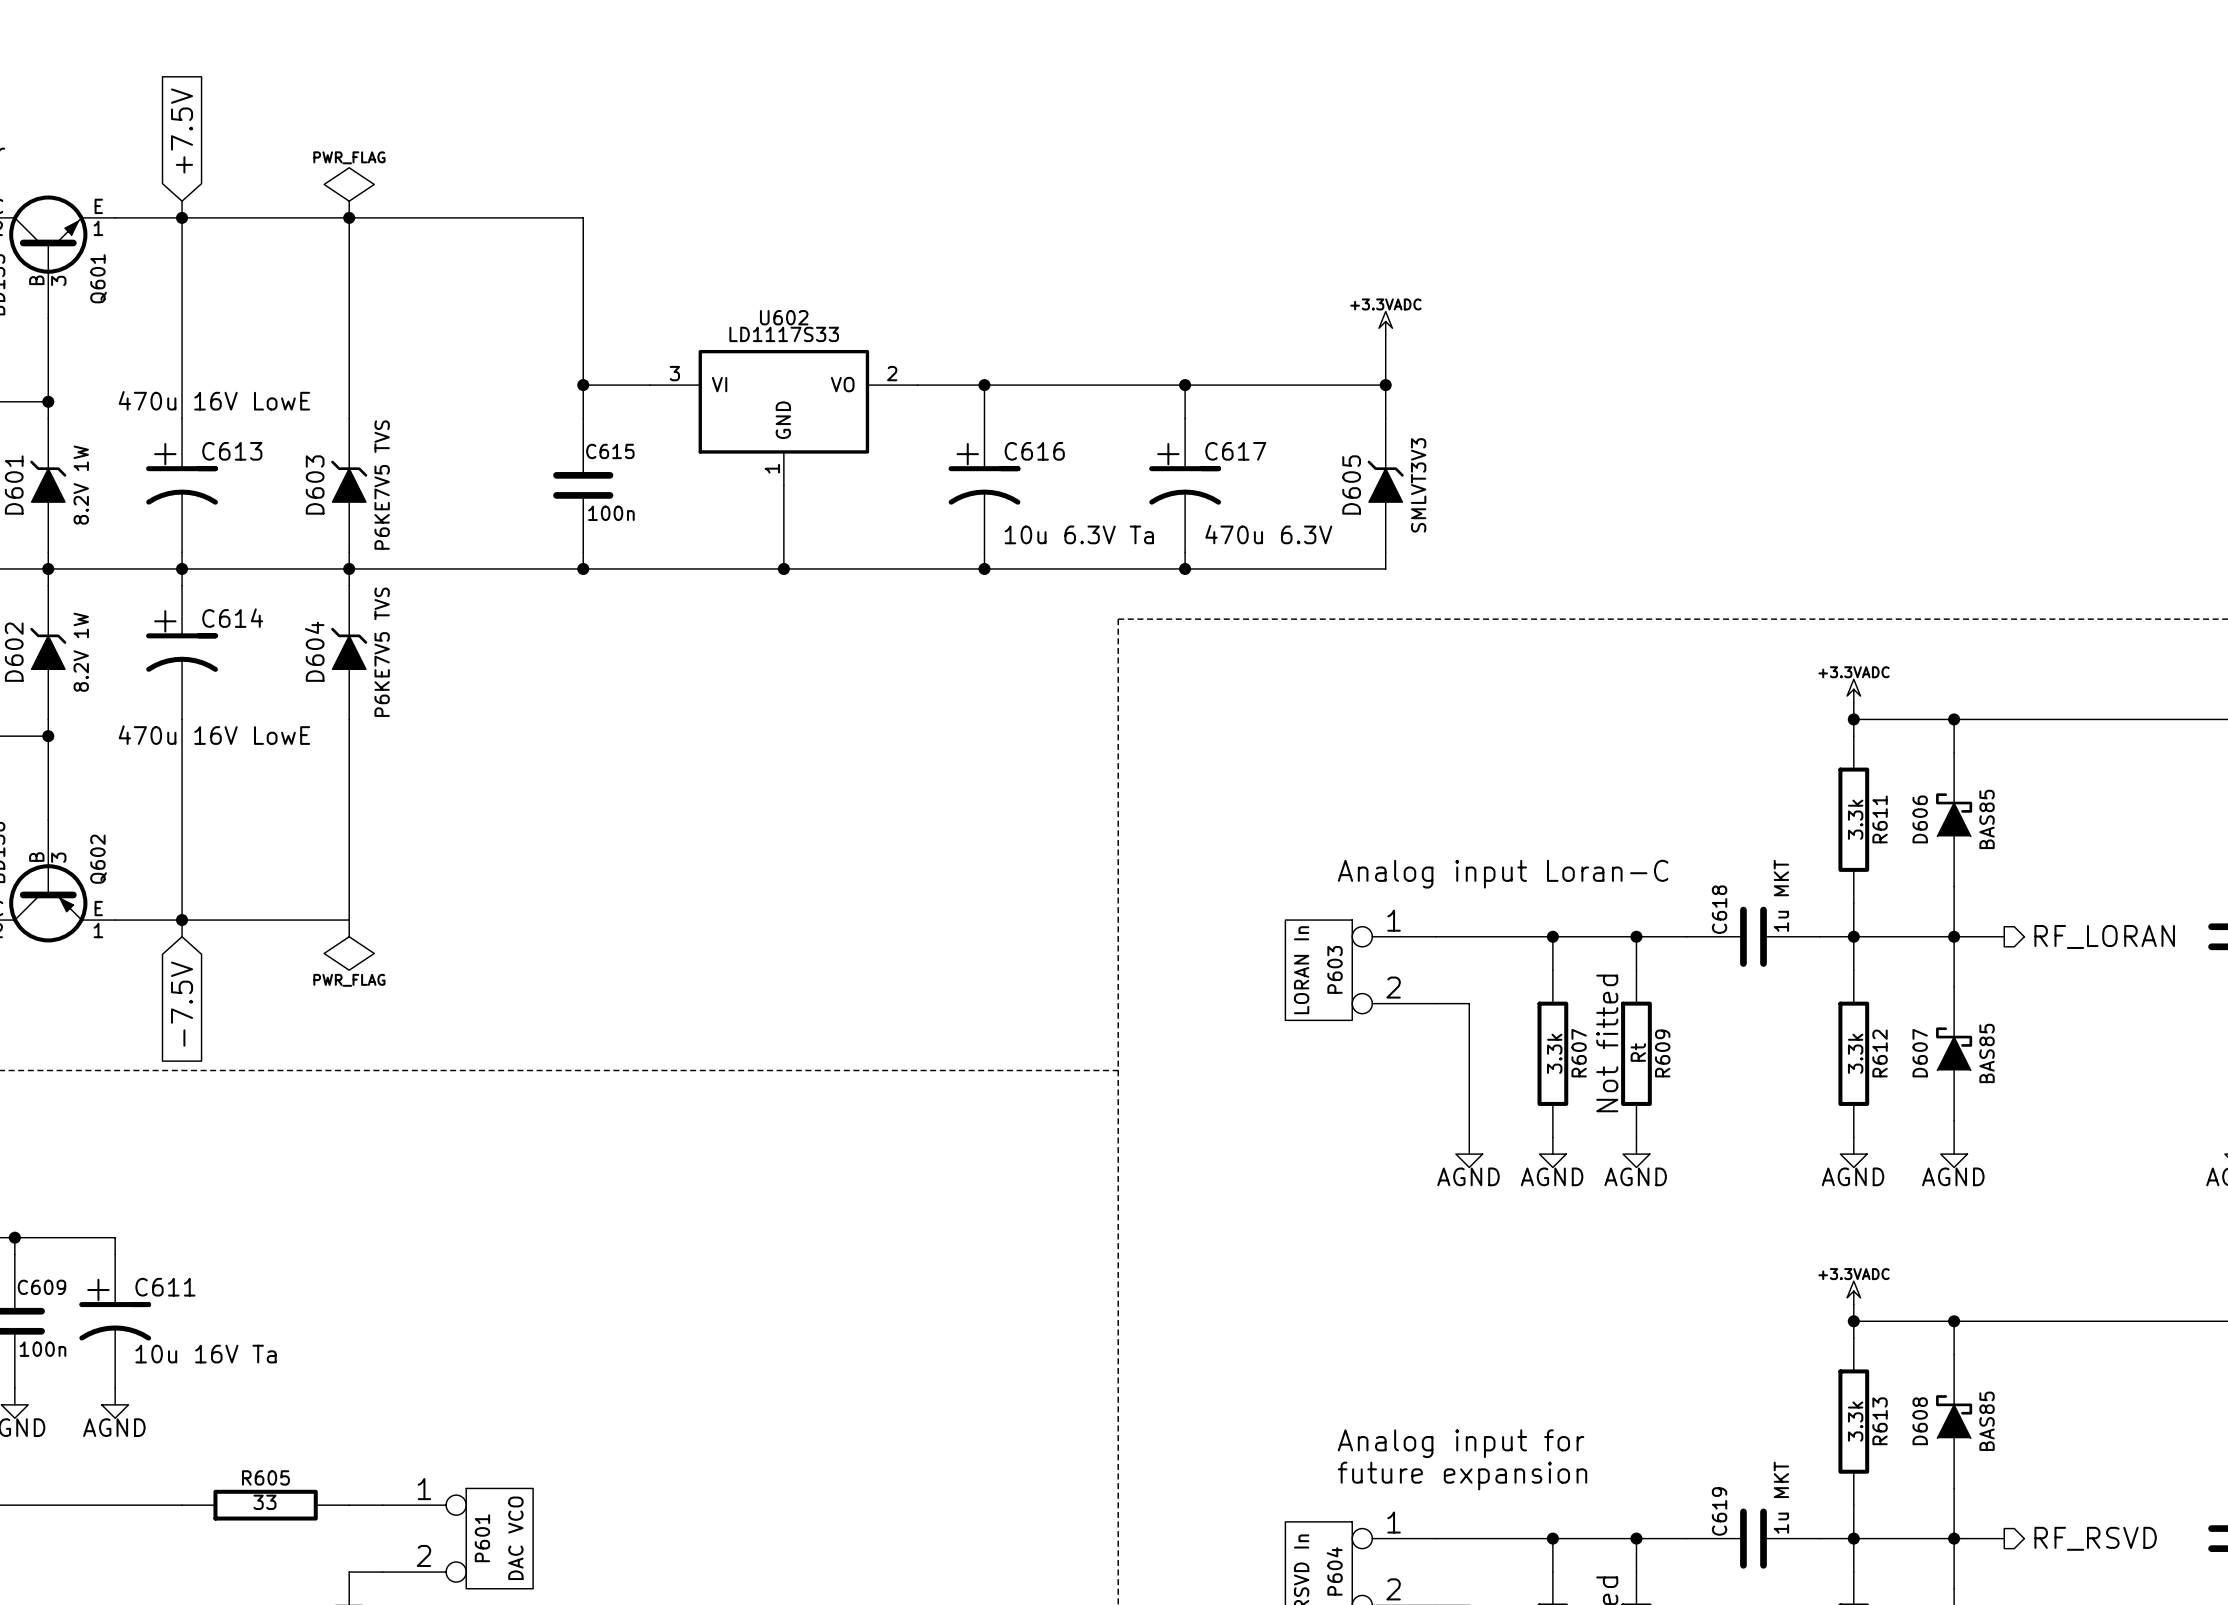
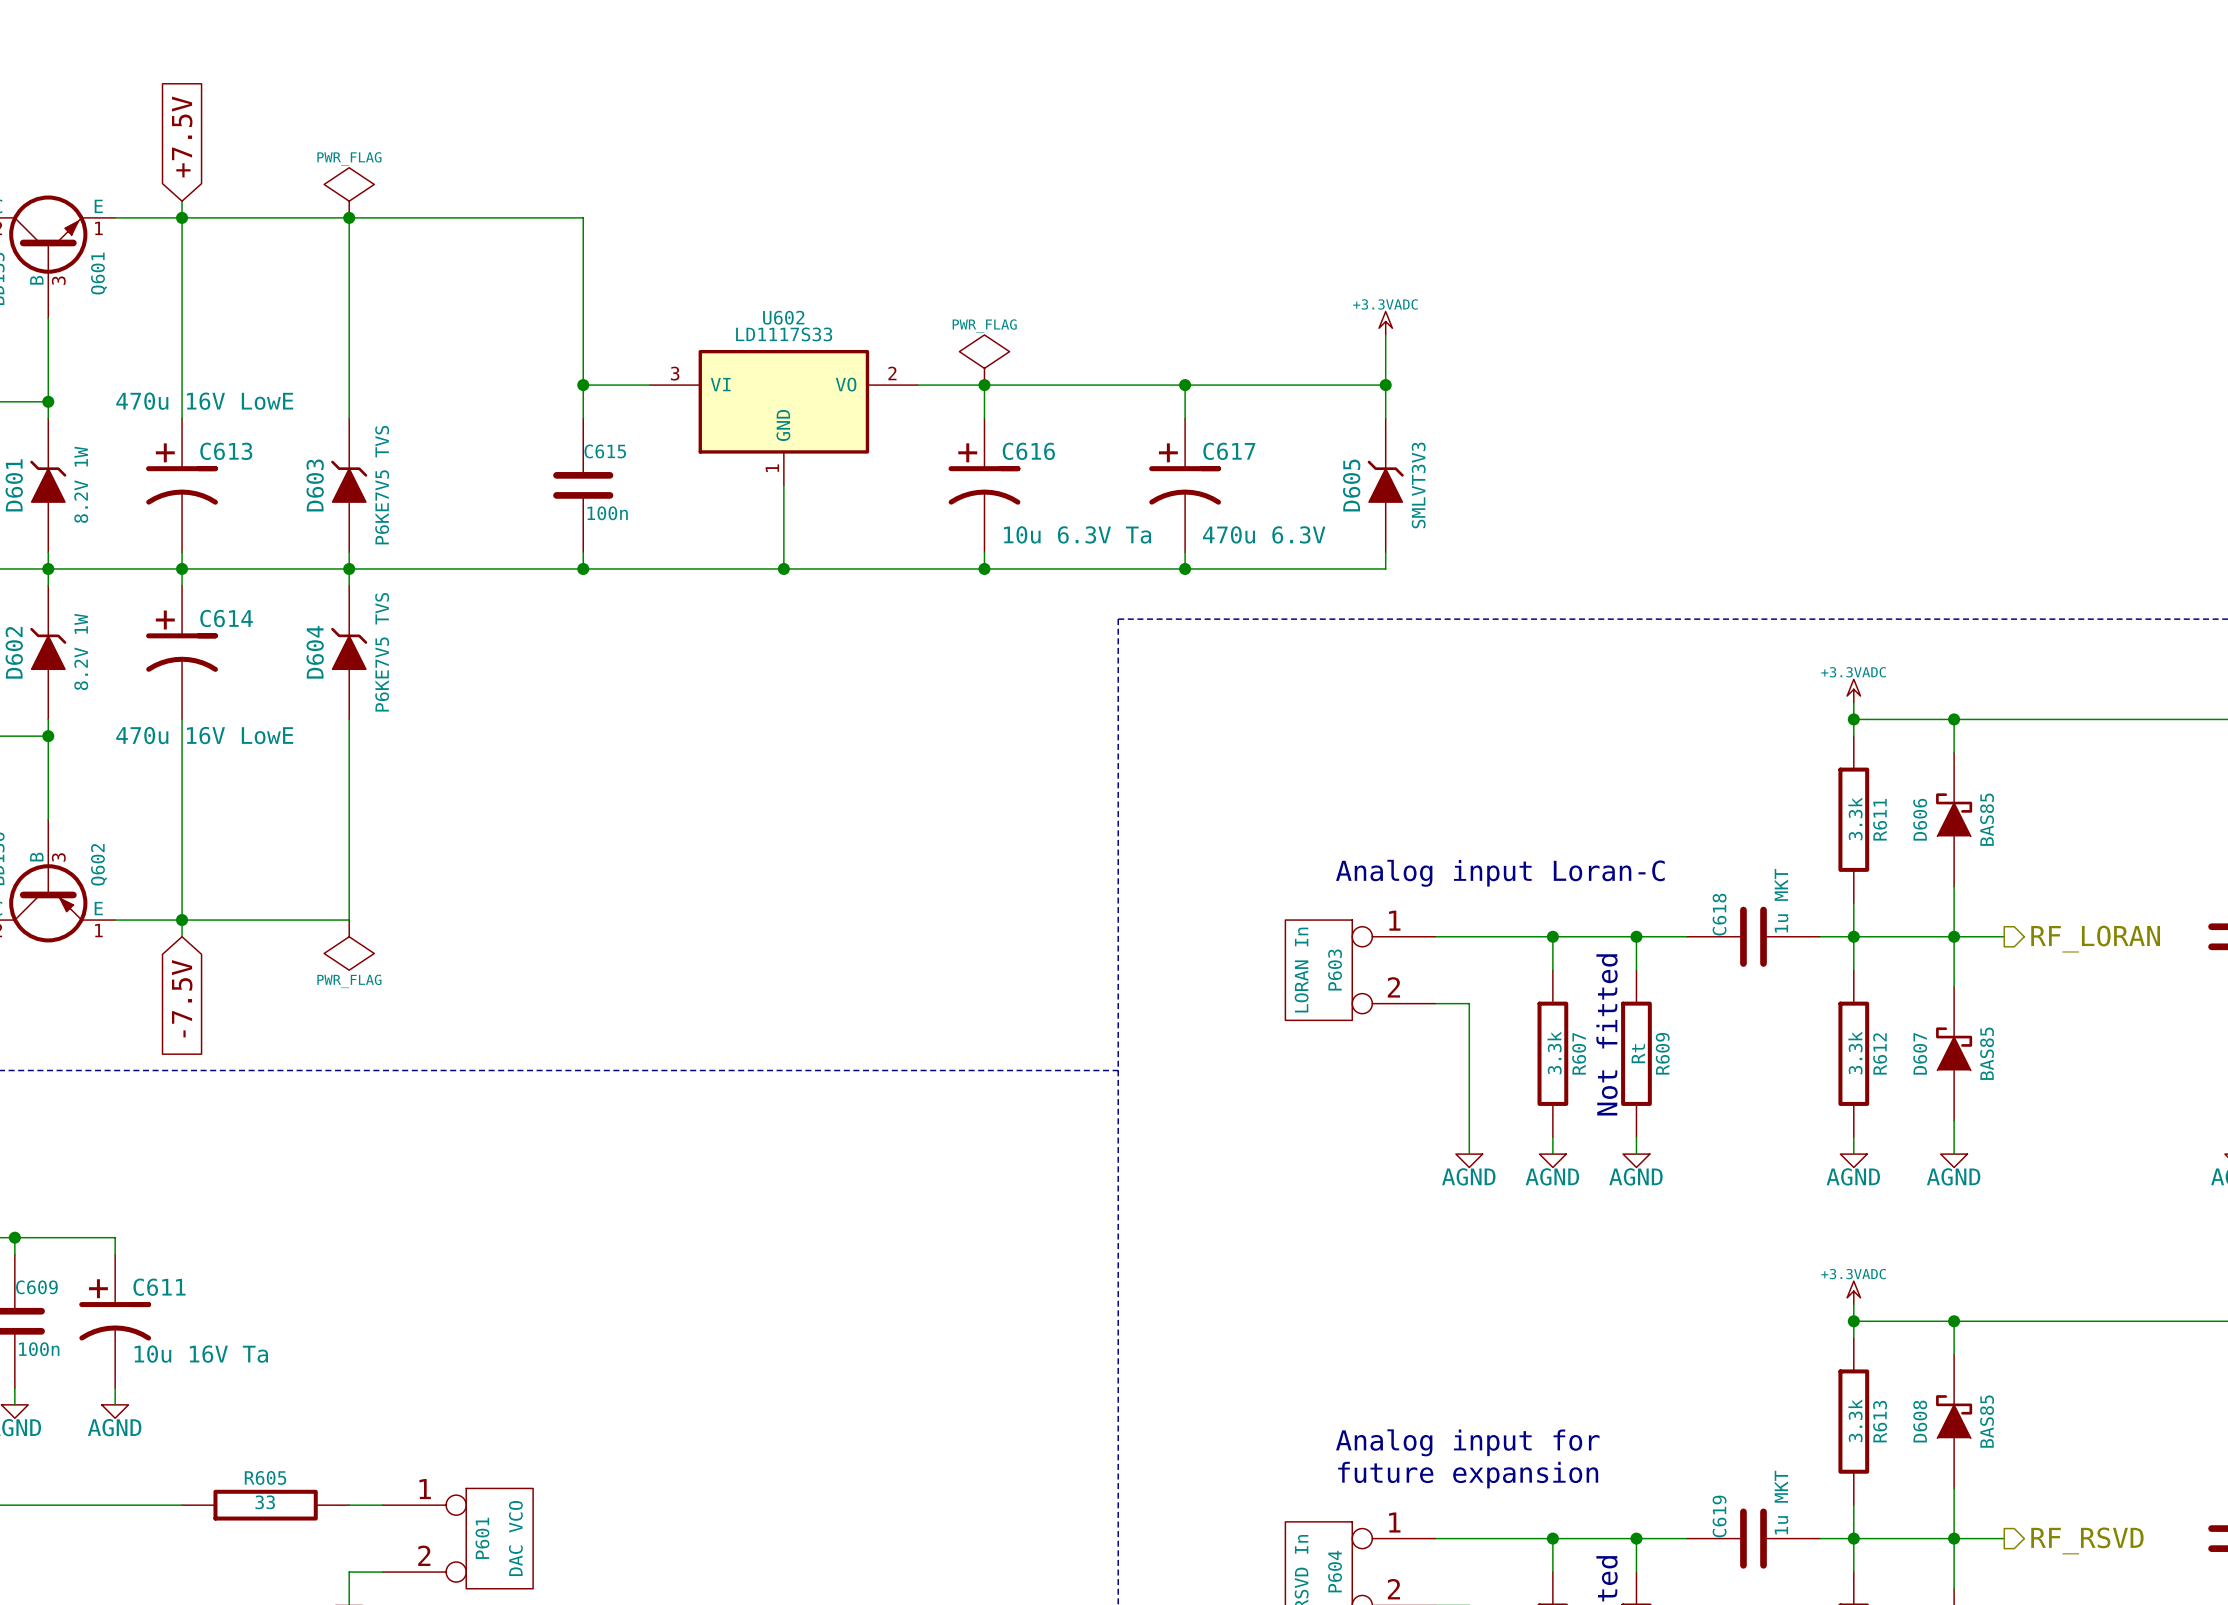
power symbol: none -> PWR_FLAG (984, 360)

